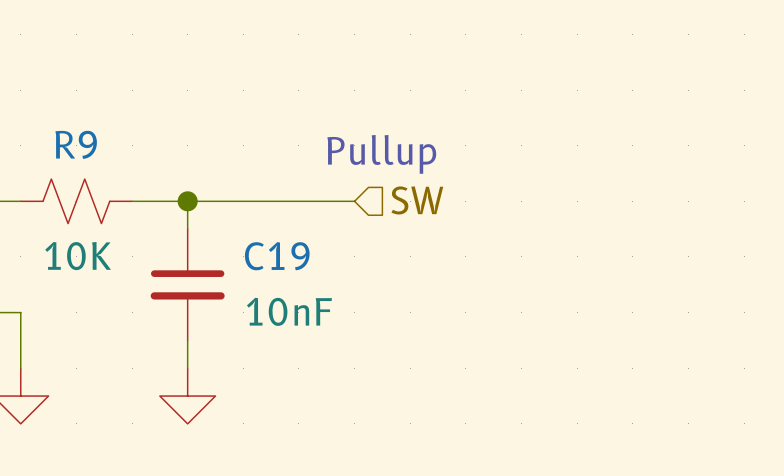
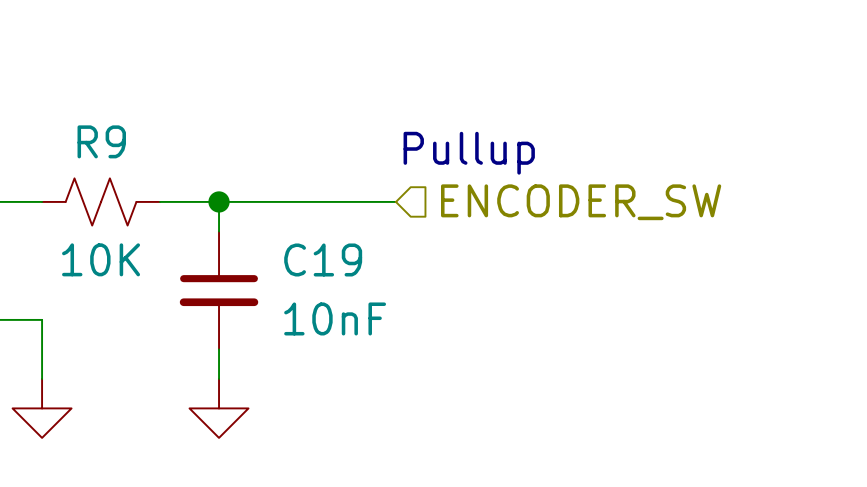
text position: Pullup (381, 154) -> Pullup (469, 153)
hierarchical label: SW (417, 200) -> ENCODER_SW (581, 202)

